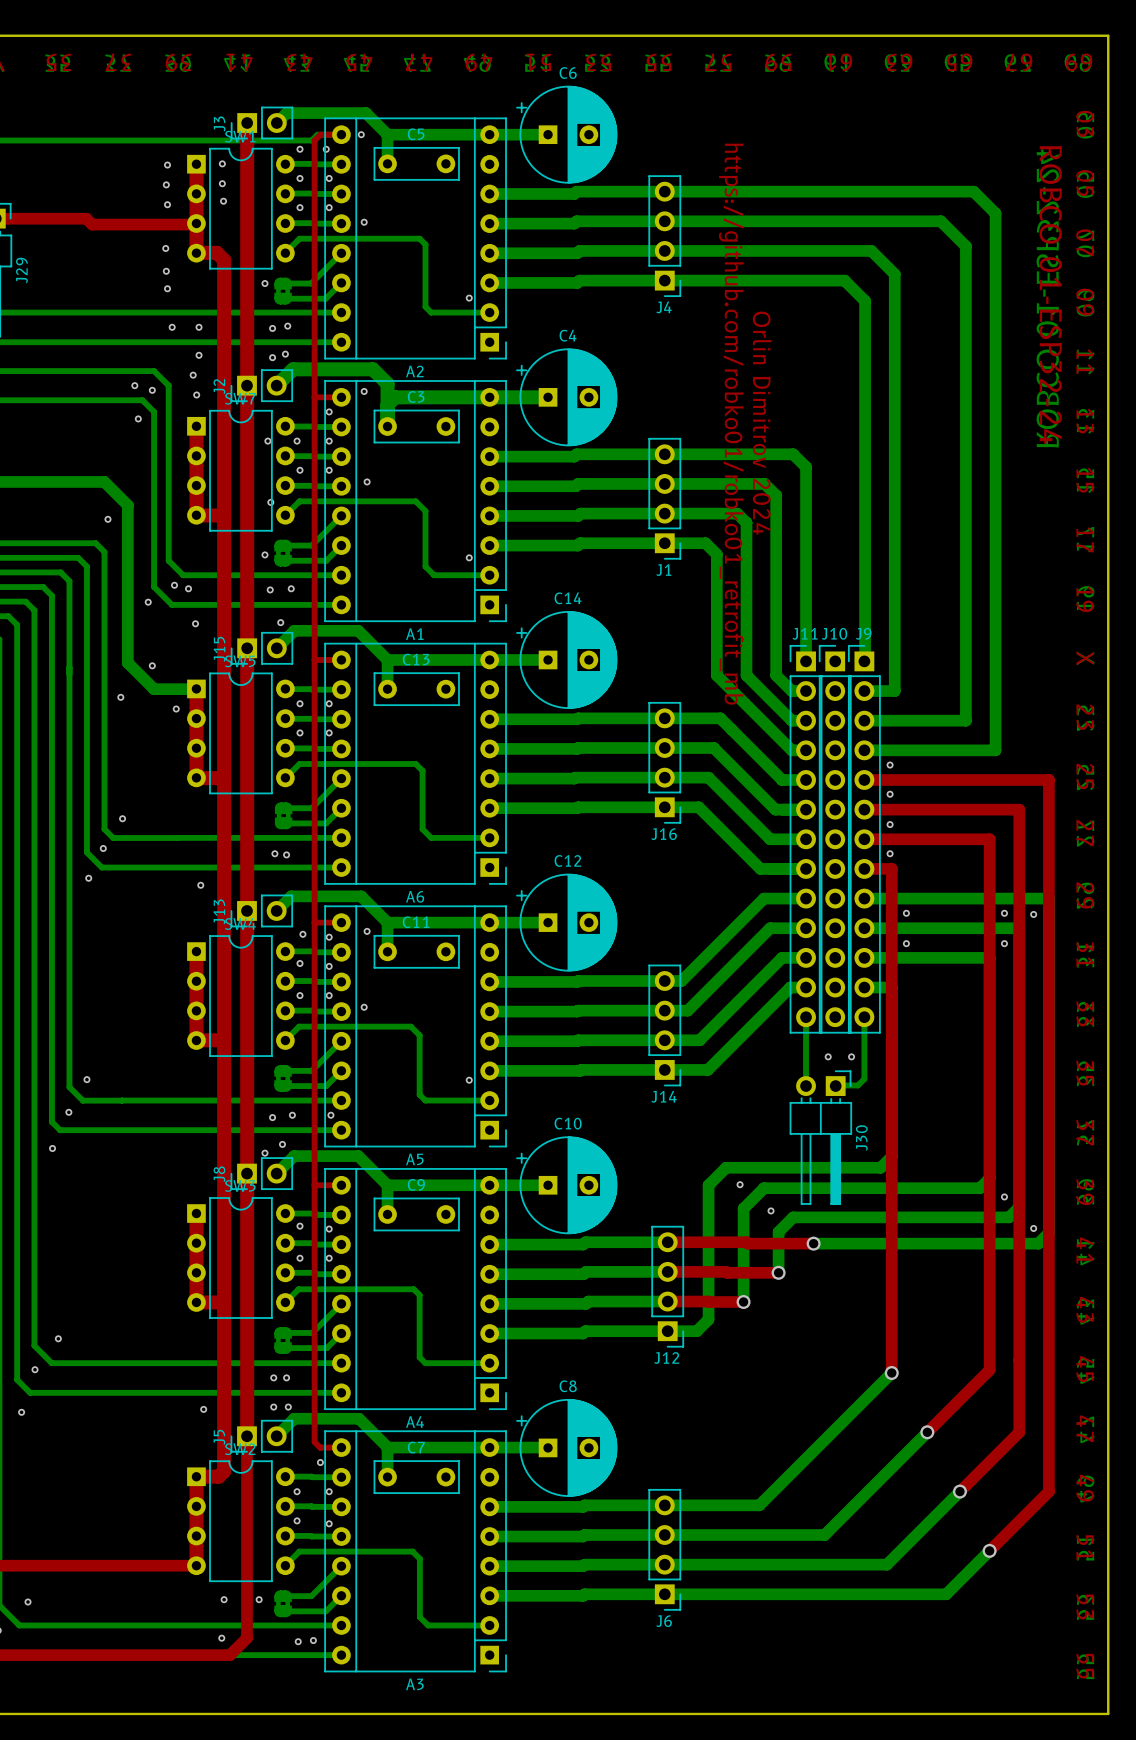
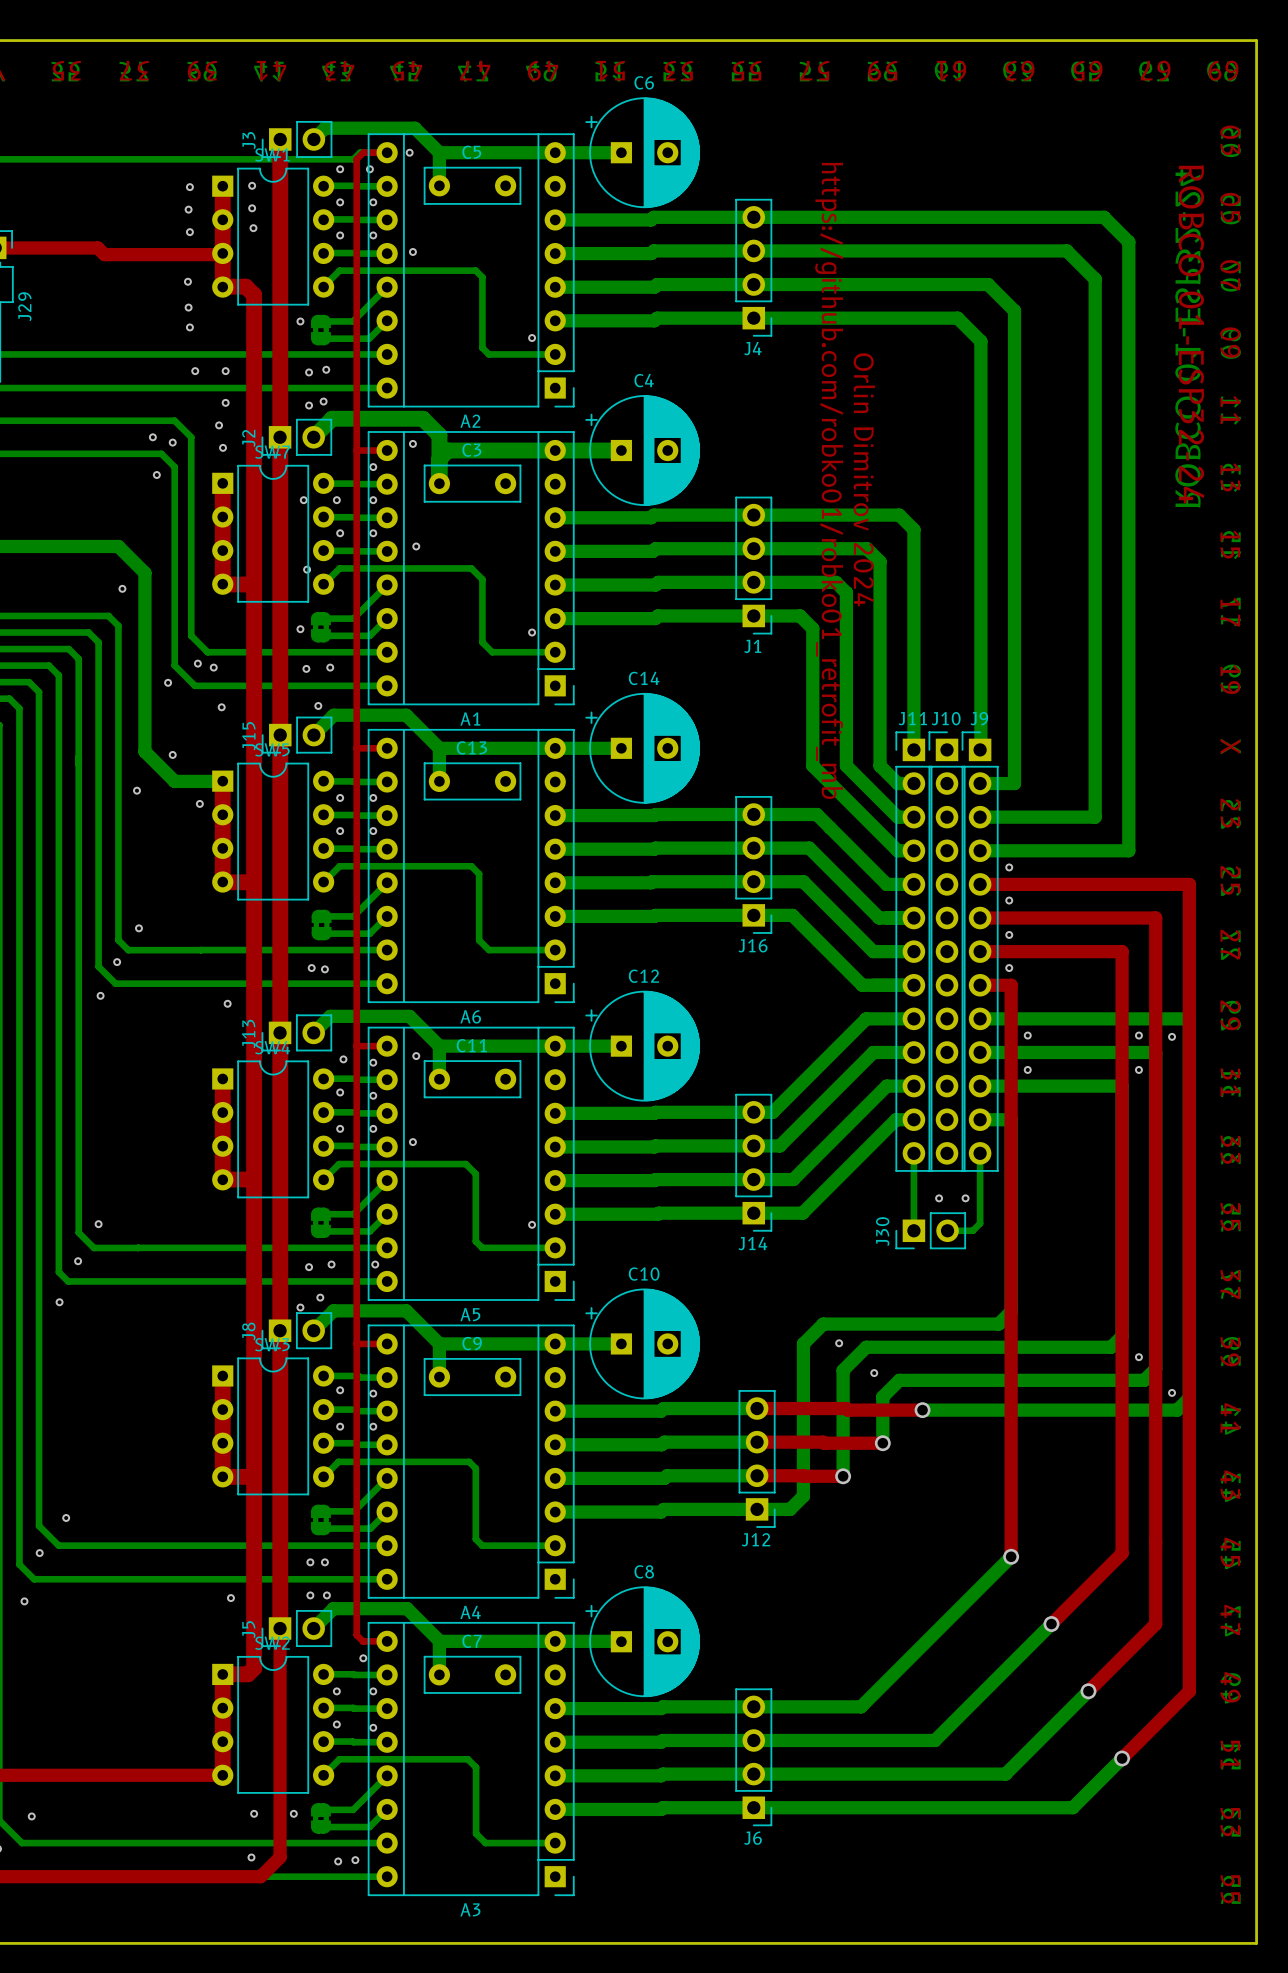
J30 footprint: [789, 1070, 852, 1205] -> [895, 1212, 966, 1250]
J30 name position: J30 (861, 1137) -> J30 (882, 1231)

